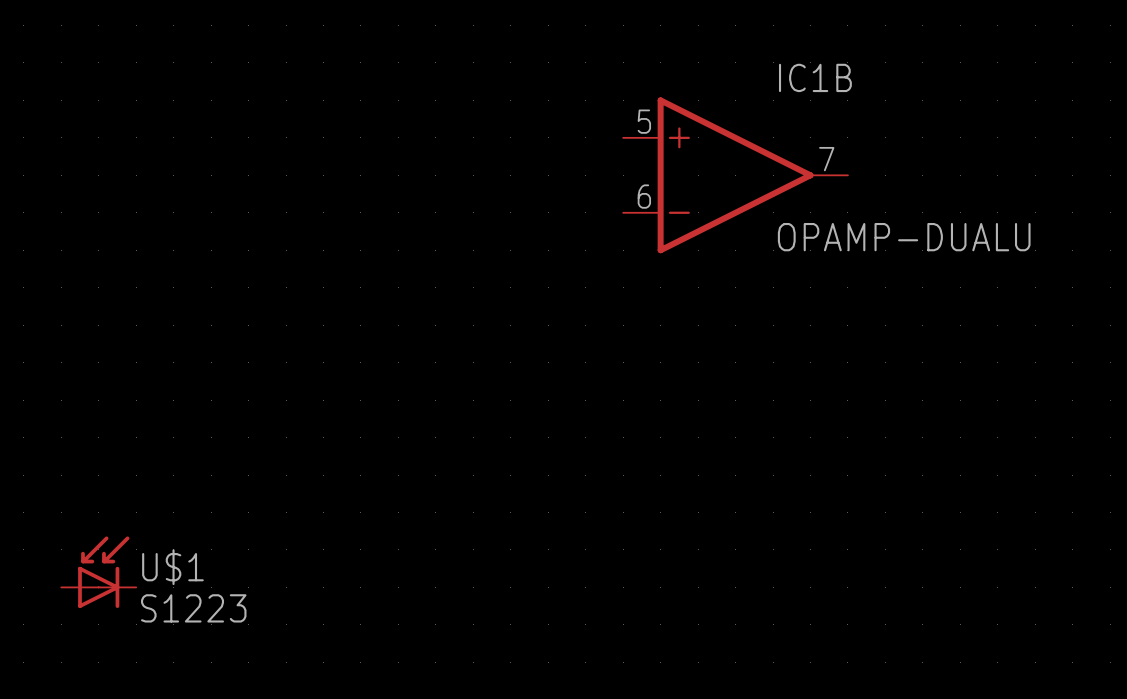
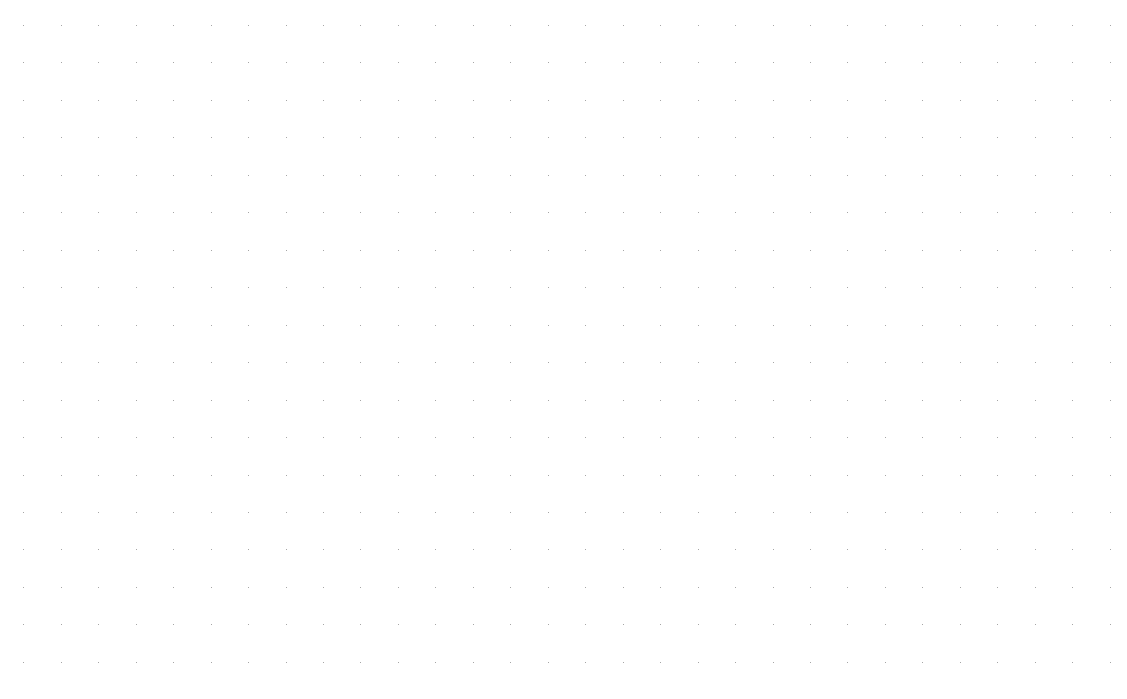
IC1B: OPAMP-DUALU (735, 175) -> none
U$1: S1223 (98, 572) -> none

